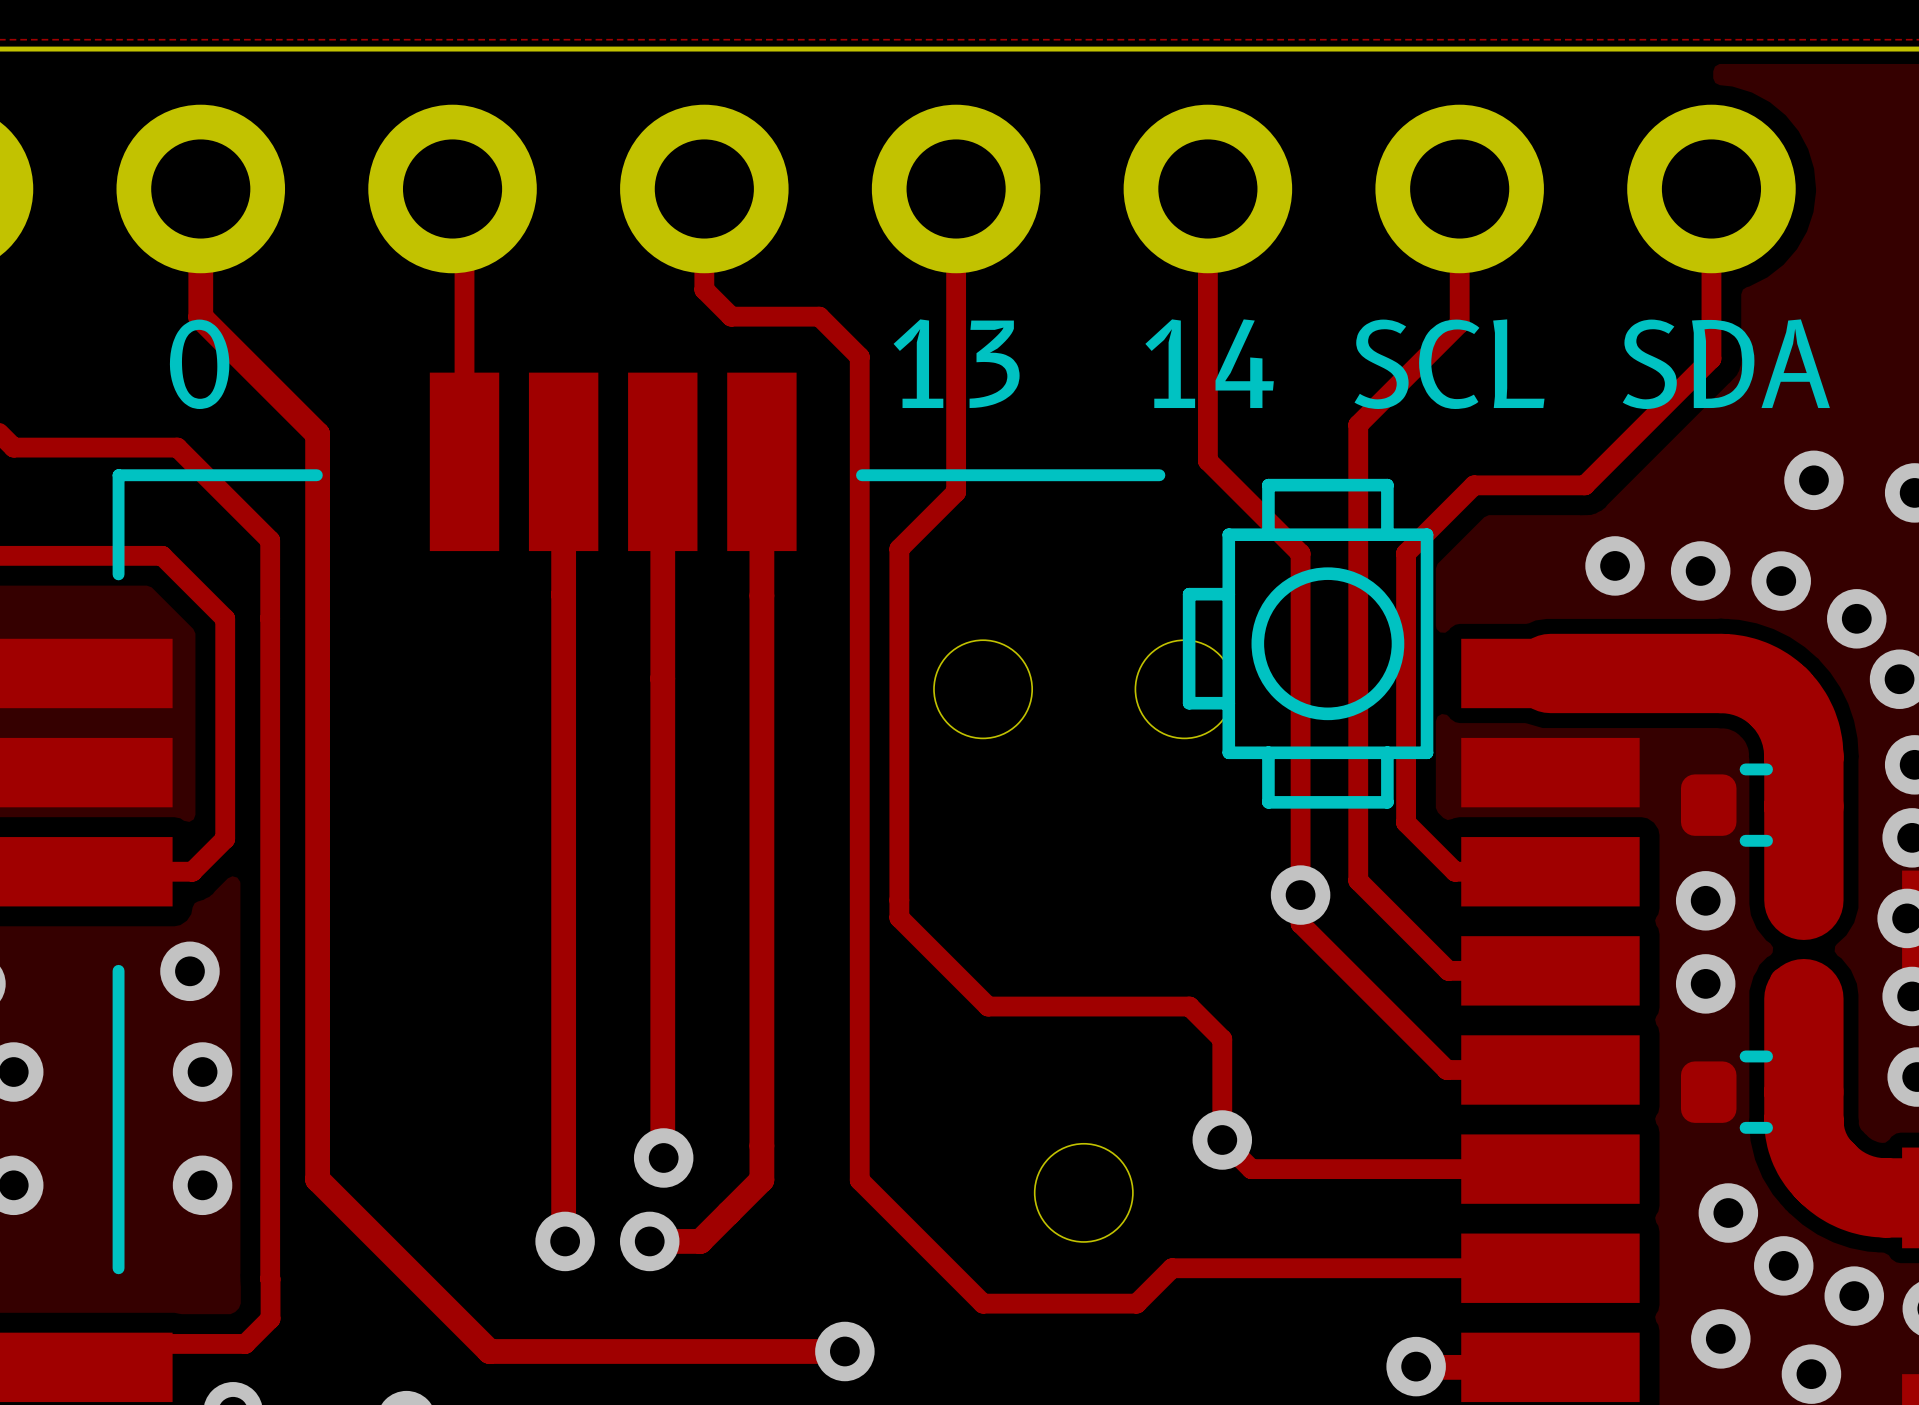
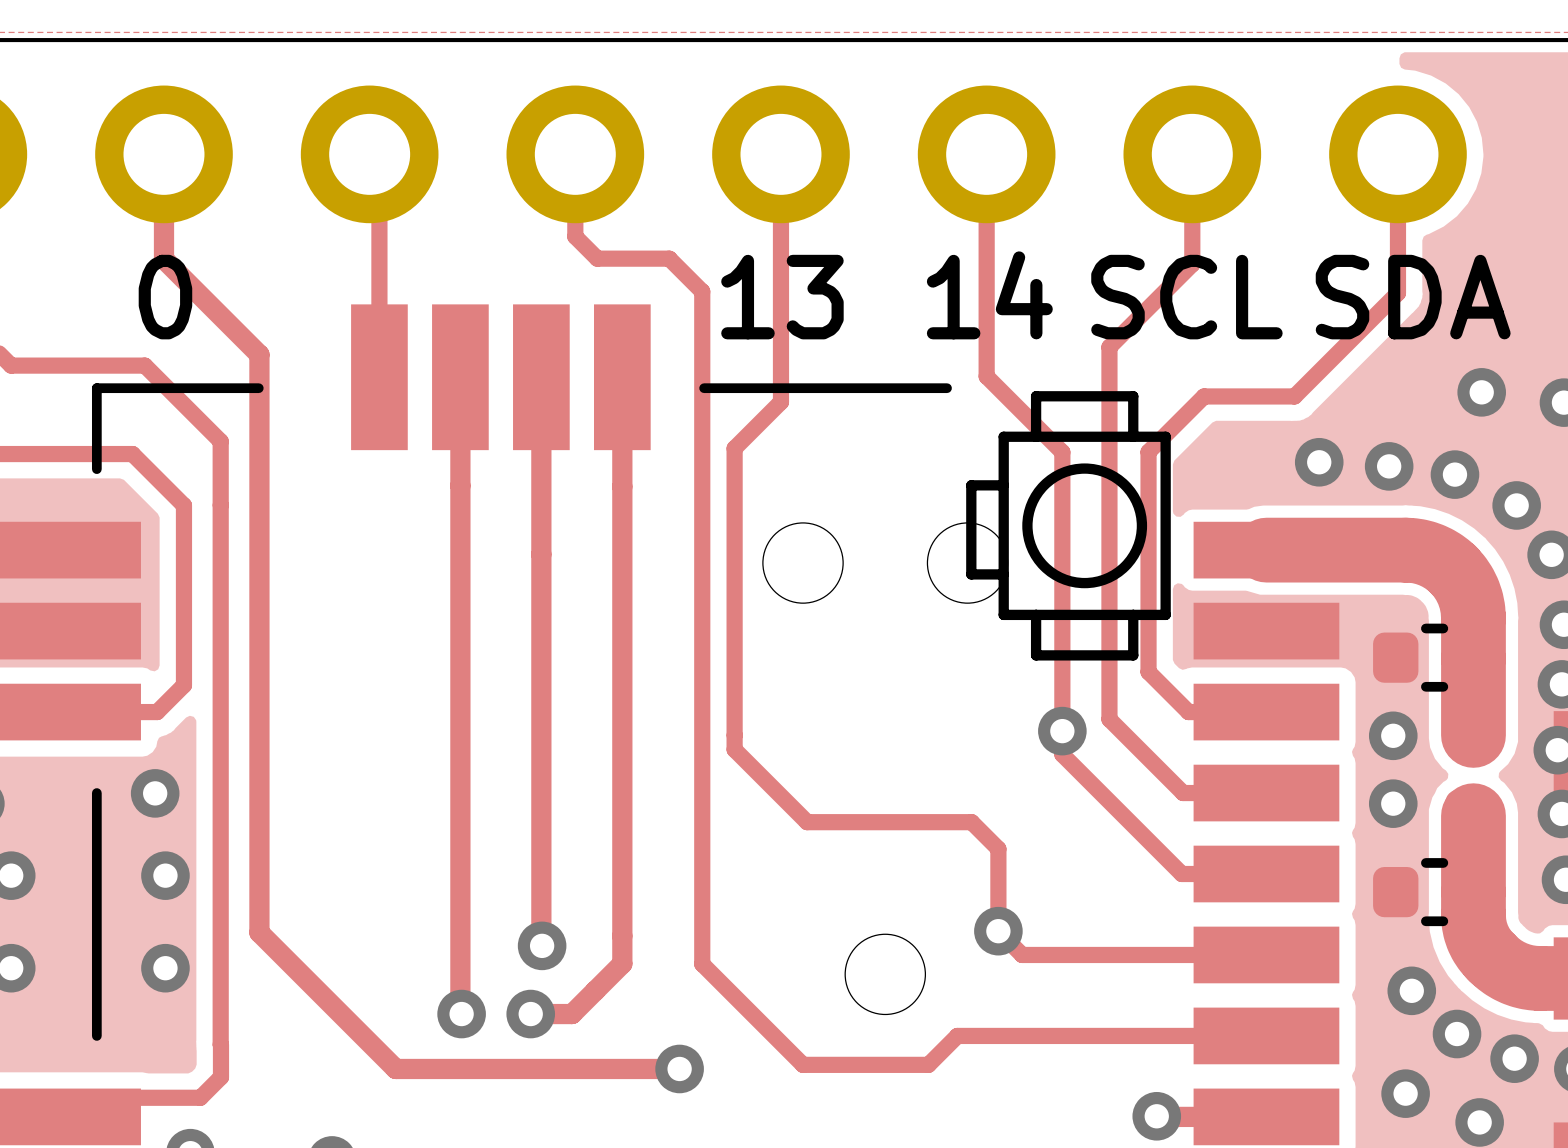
track: (317, 1141) (317, 1179) (489, 1351) (844, 1351) -> (259, 932) (395, 1068) (679, 1068)
via position: (844, 1351) -> (679, 1068)

